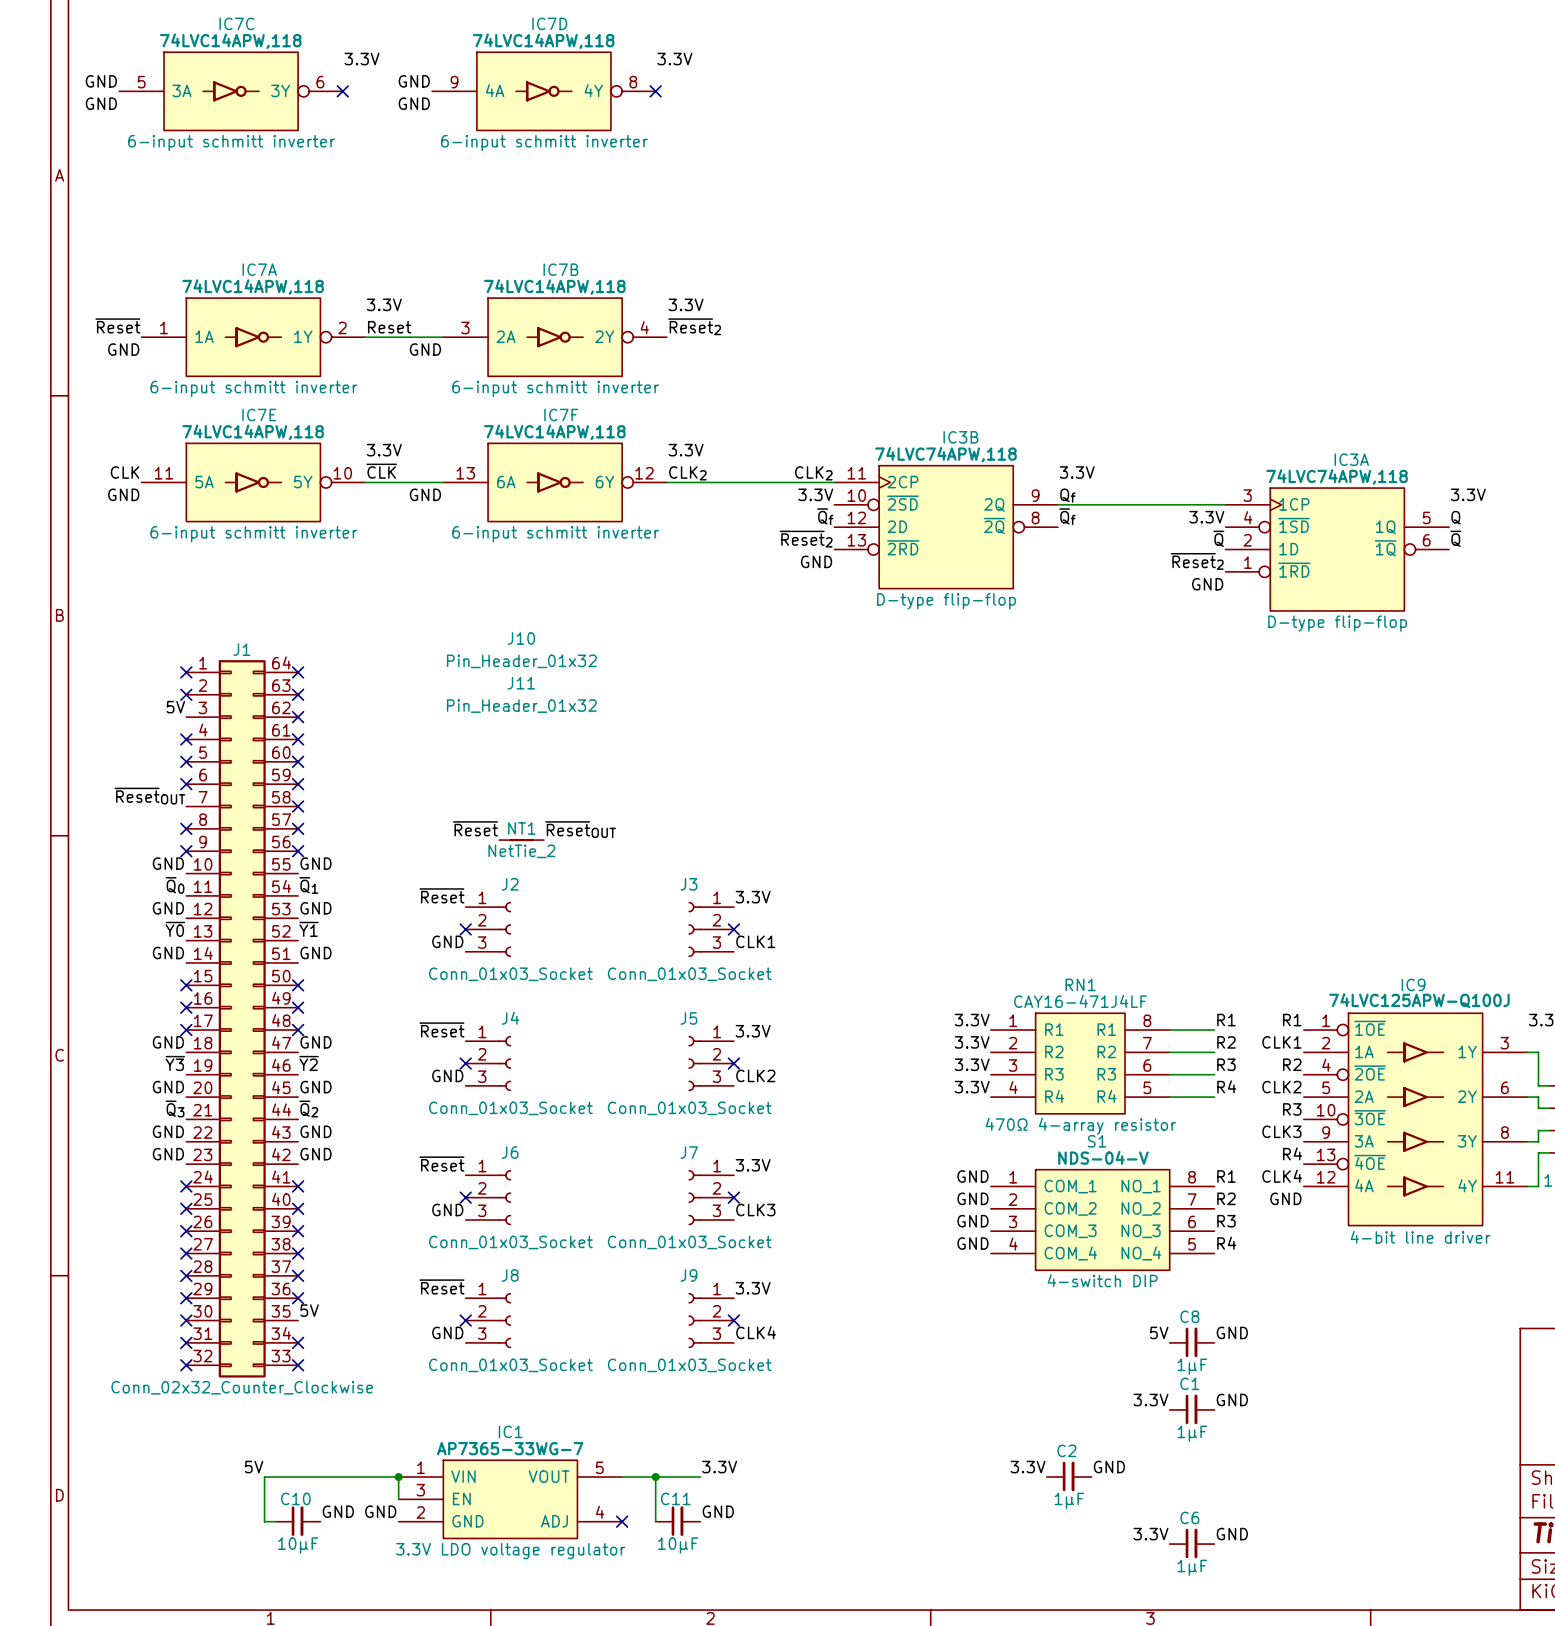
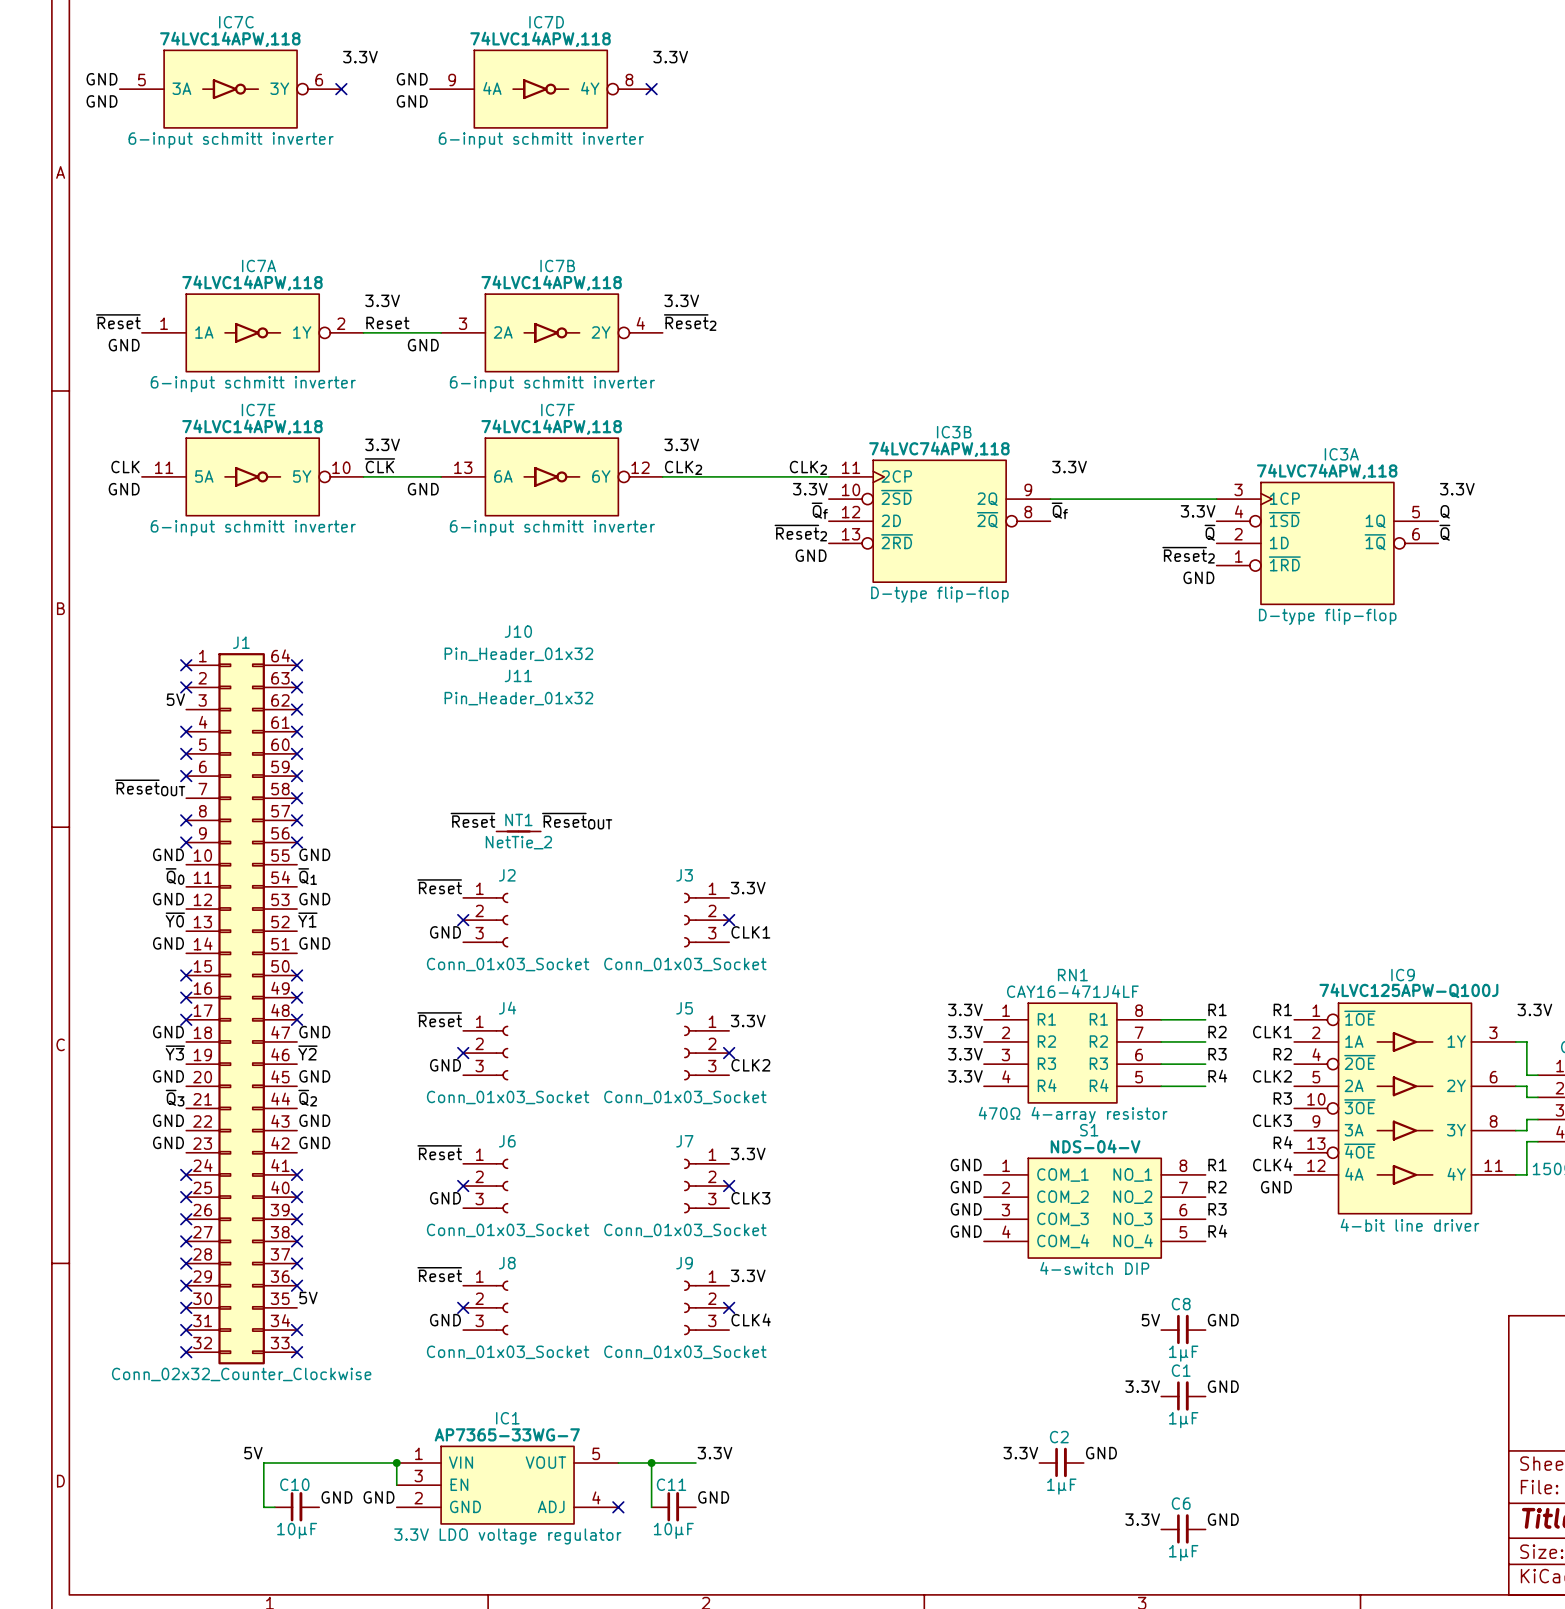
label: Qf (1067, 495) -> none

